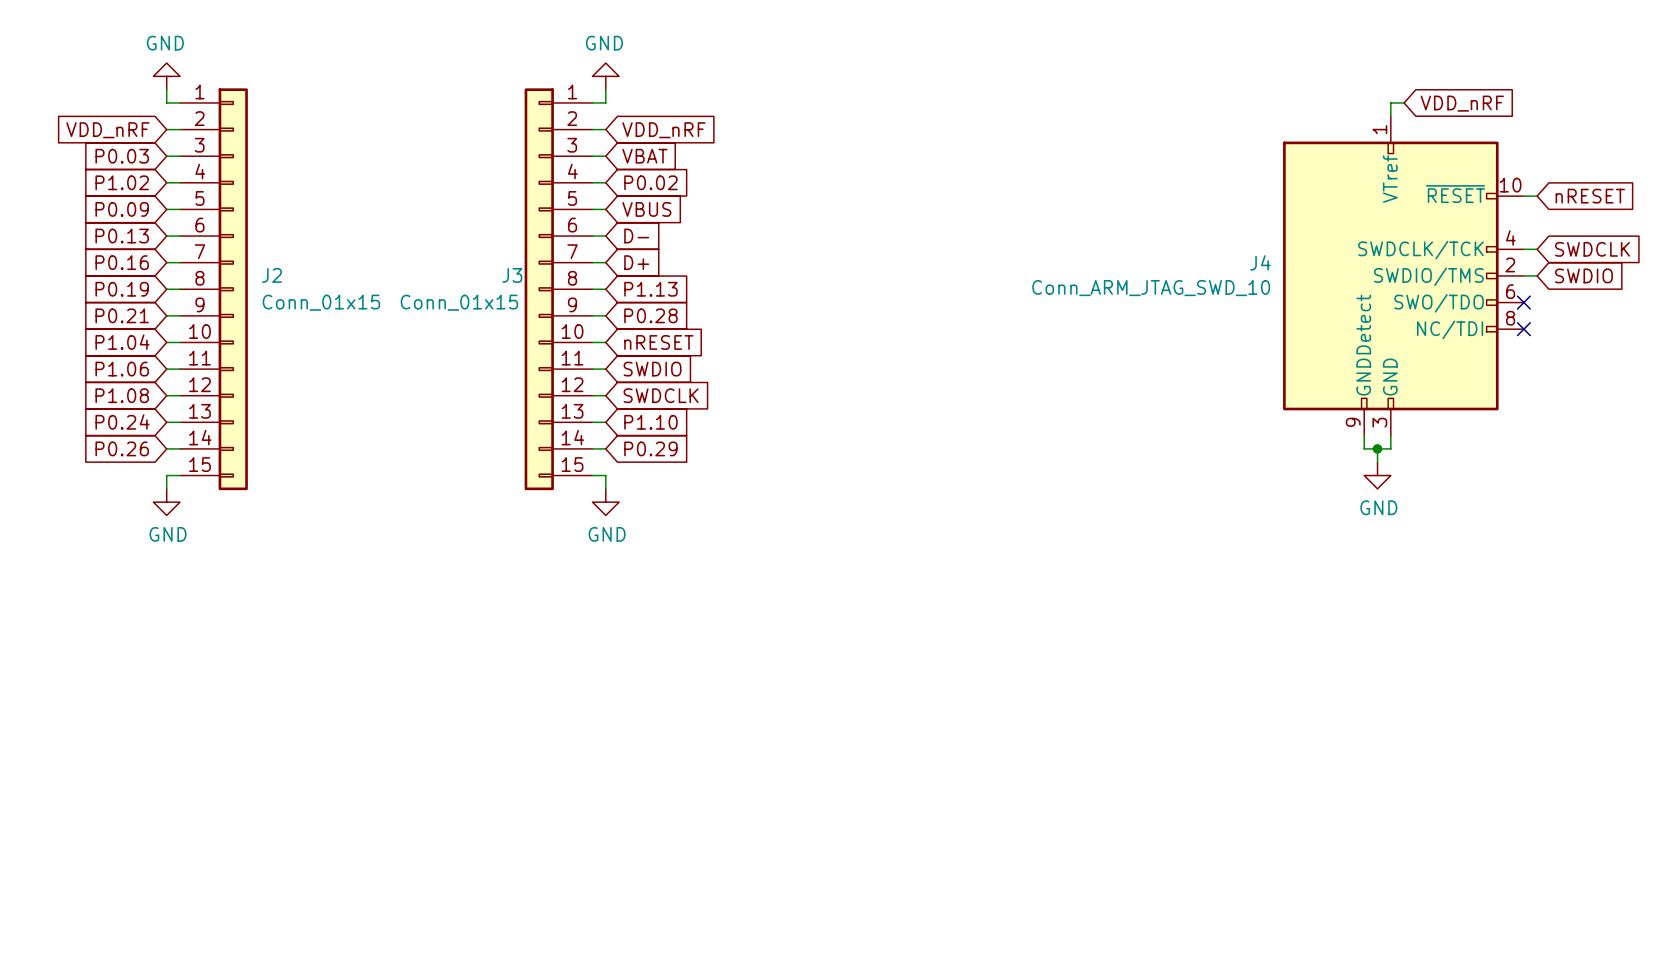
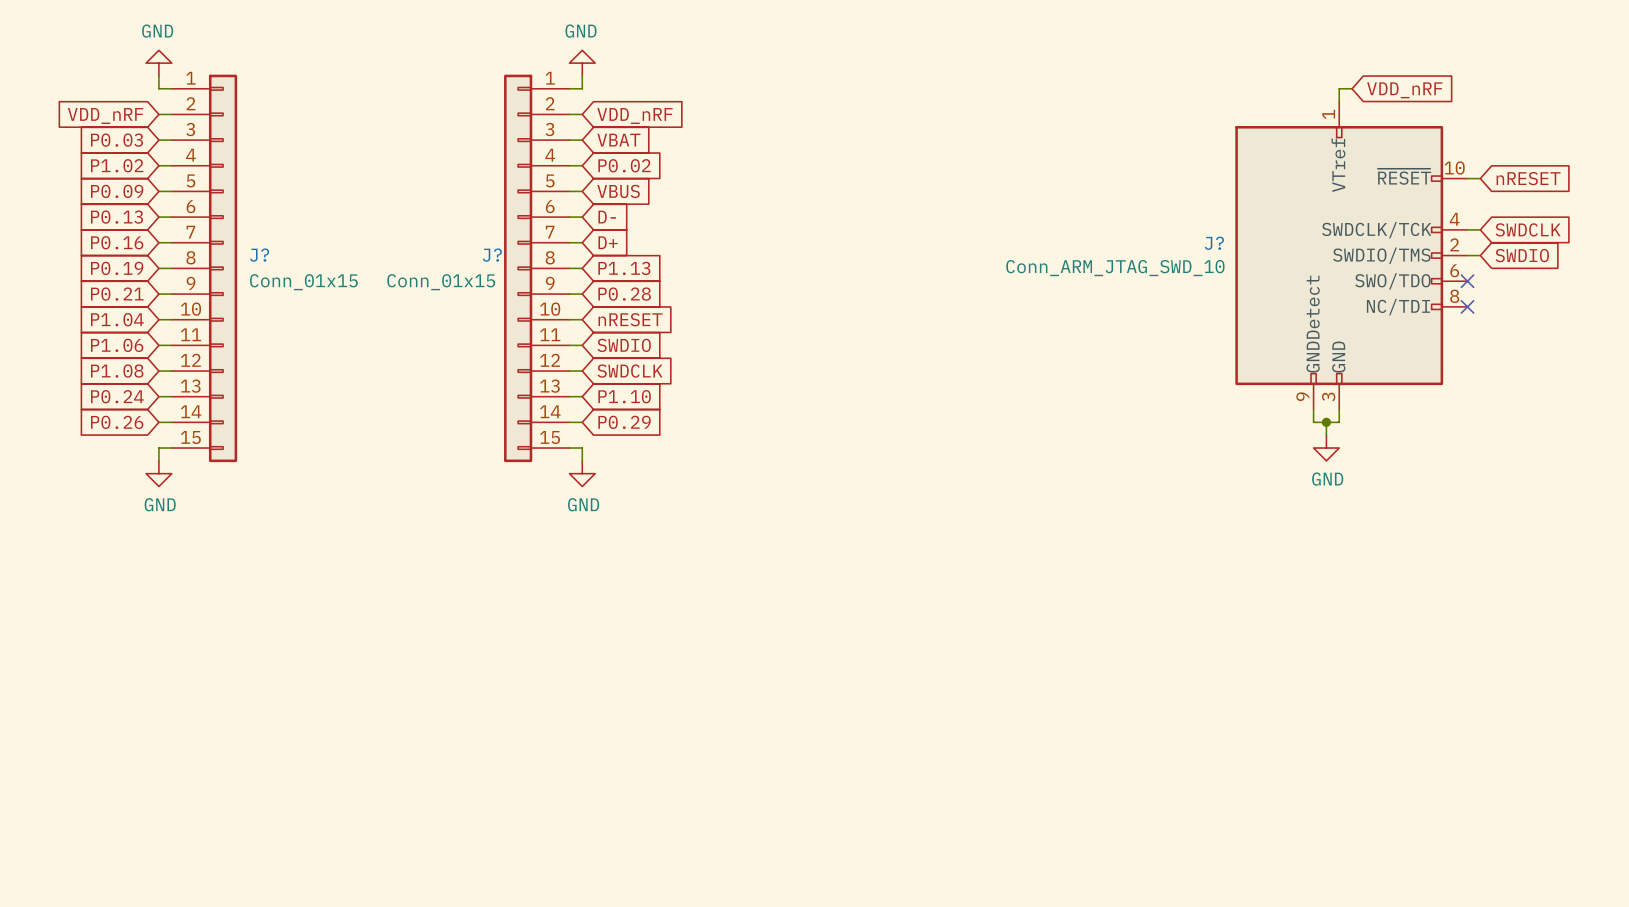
J4 name: J4 (1260, 262) -> J? (1214, 243)
J2 name: J2 (271, 275) -> J? (259, 255)
J3 name: J3 (512, 275) -> J? (492, 255)

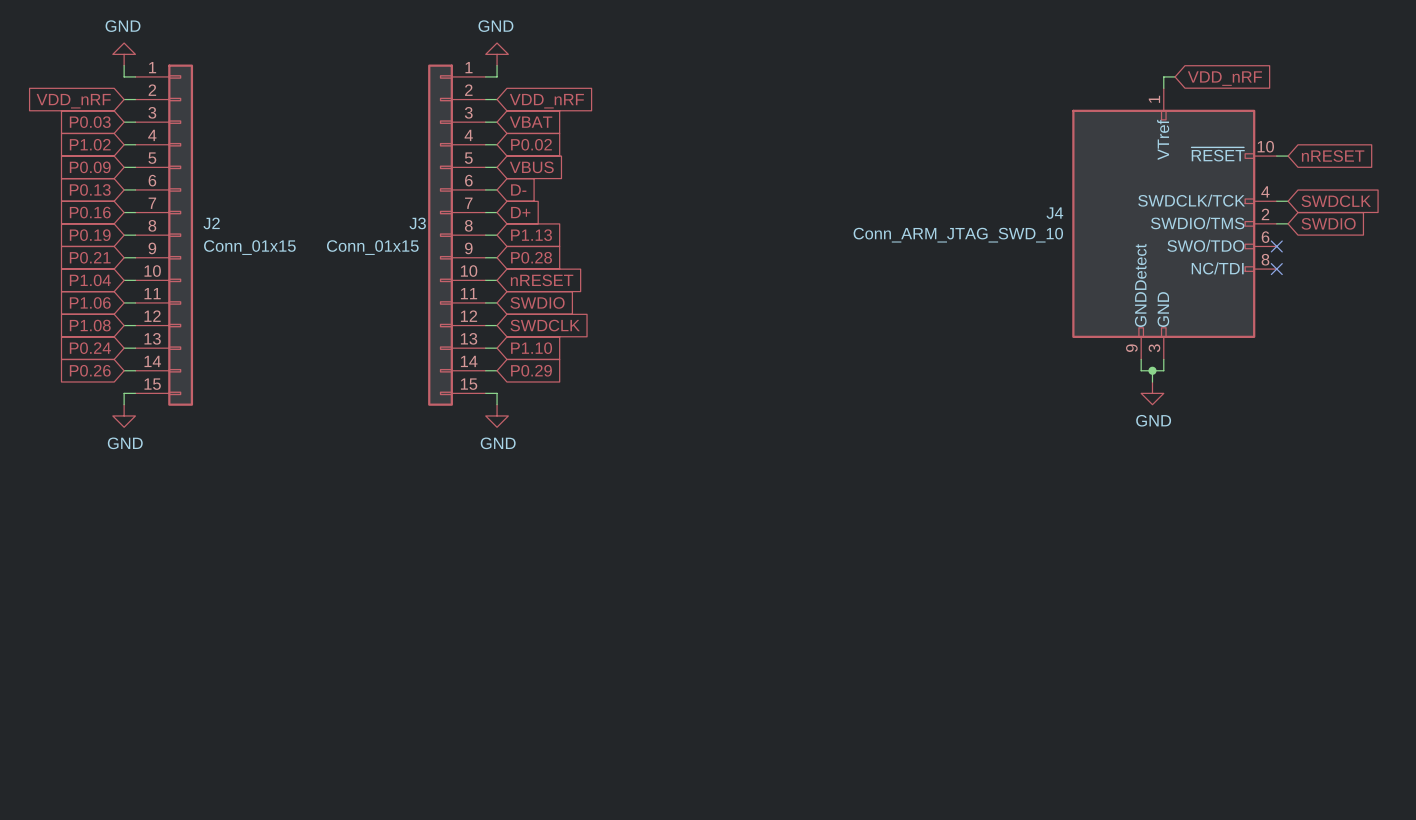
J? name: J? (1214, 243) -> J4 (1054, 213)
J? name: J? (259, 255) -> J2 (211, 223)
J? name: J? (492, 255) -> J3 (417, 223)

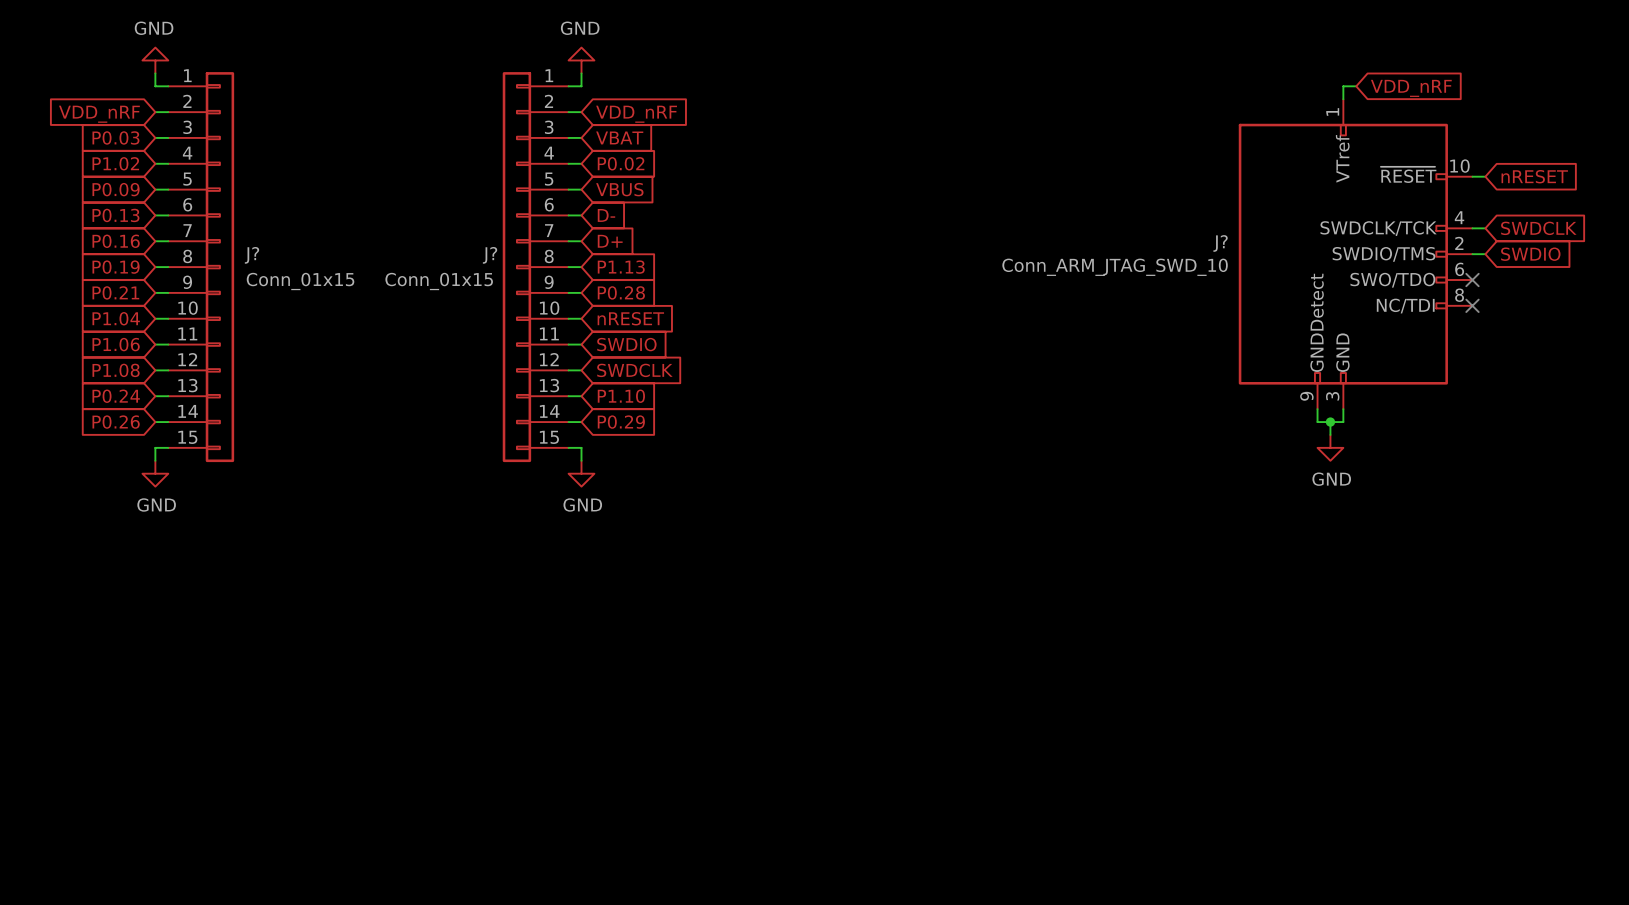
J4 name: J4 (1054, 213) -> J? (1220, 243)
J2 name: J2 (211, 223) -> J? (252, 255)
J3 name: J3 (417, 223) -> J? (490, 255)

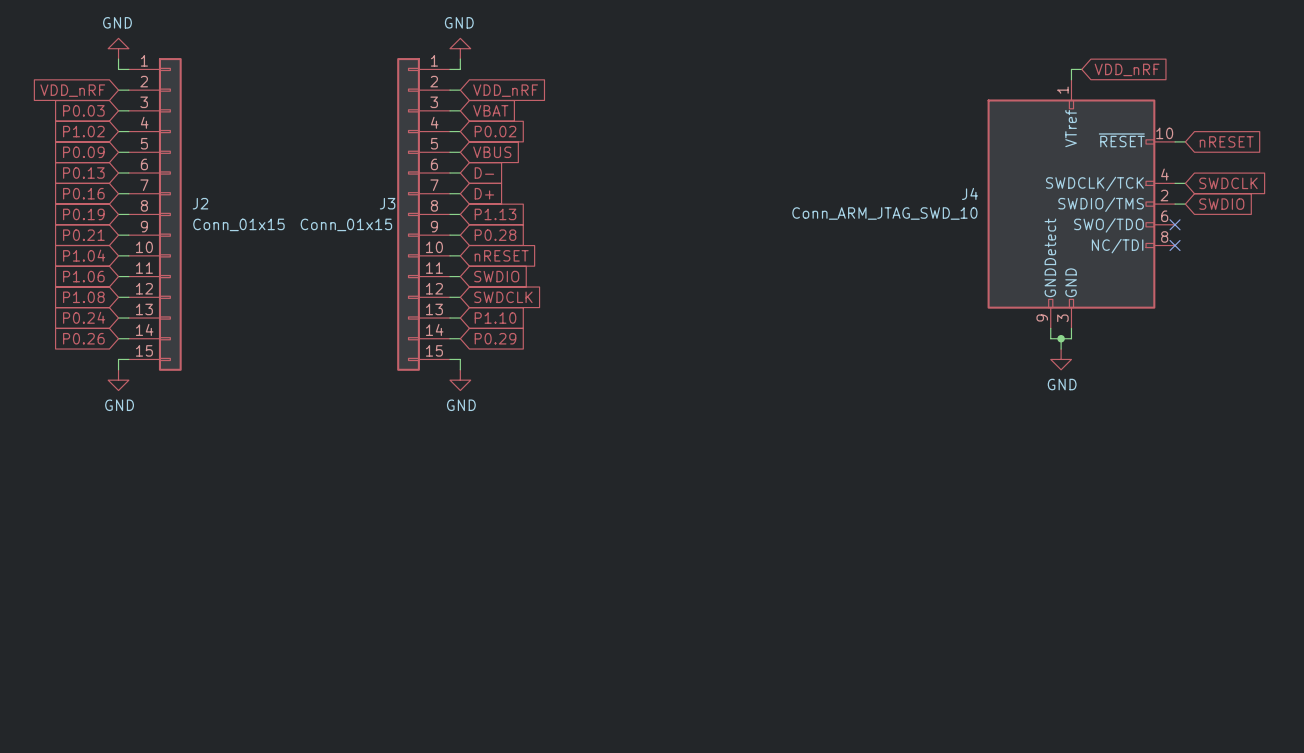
J? name: J? (1220, 243) -> J4 (969, 193)
J? name: J? (252, 255) -> J2 (200, 203)
J? name: J? (490, 255) -> J3 (387, 203)

